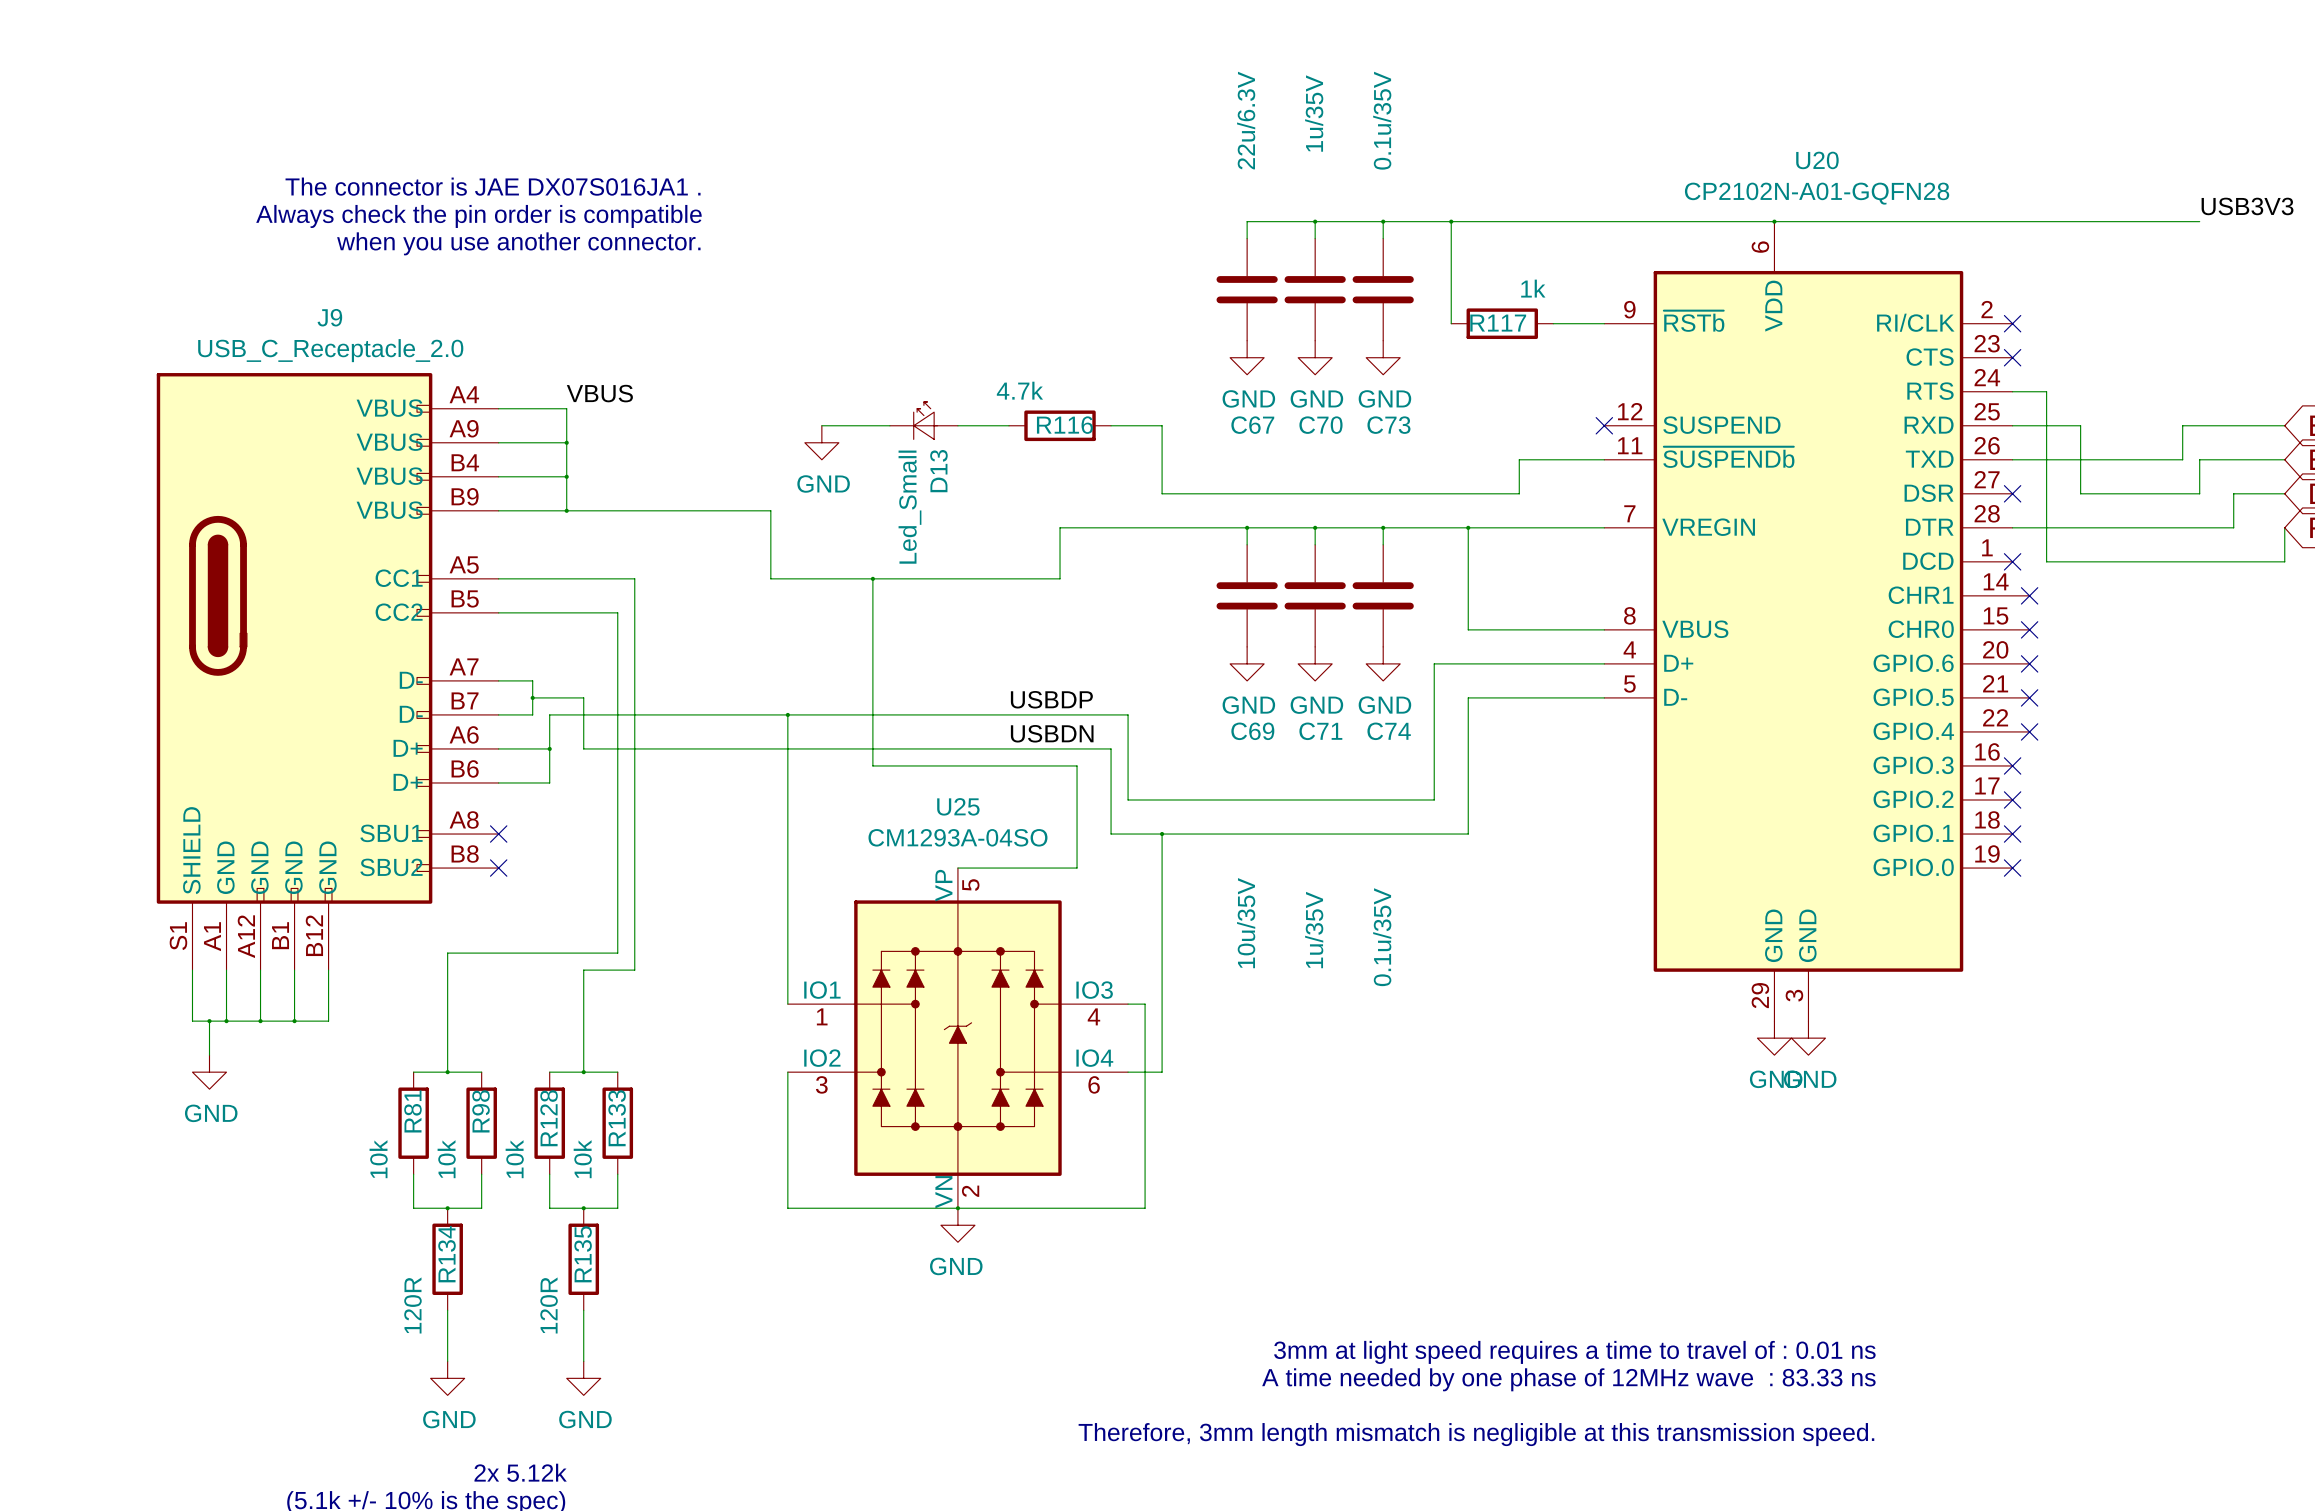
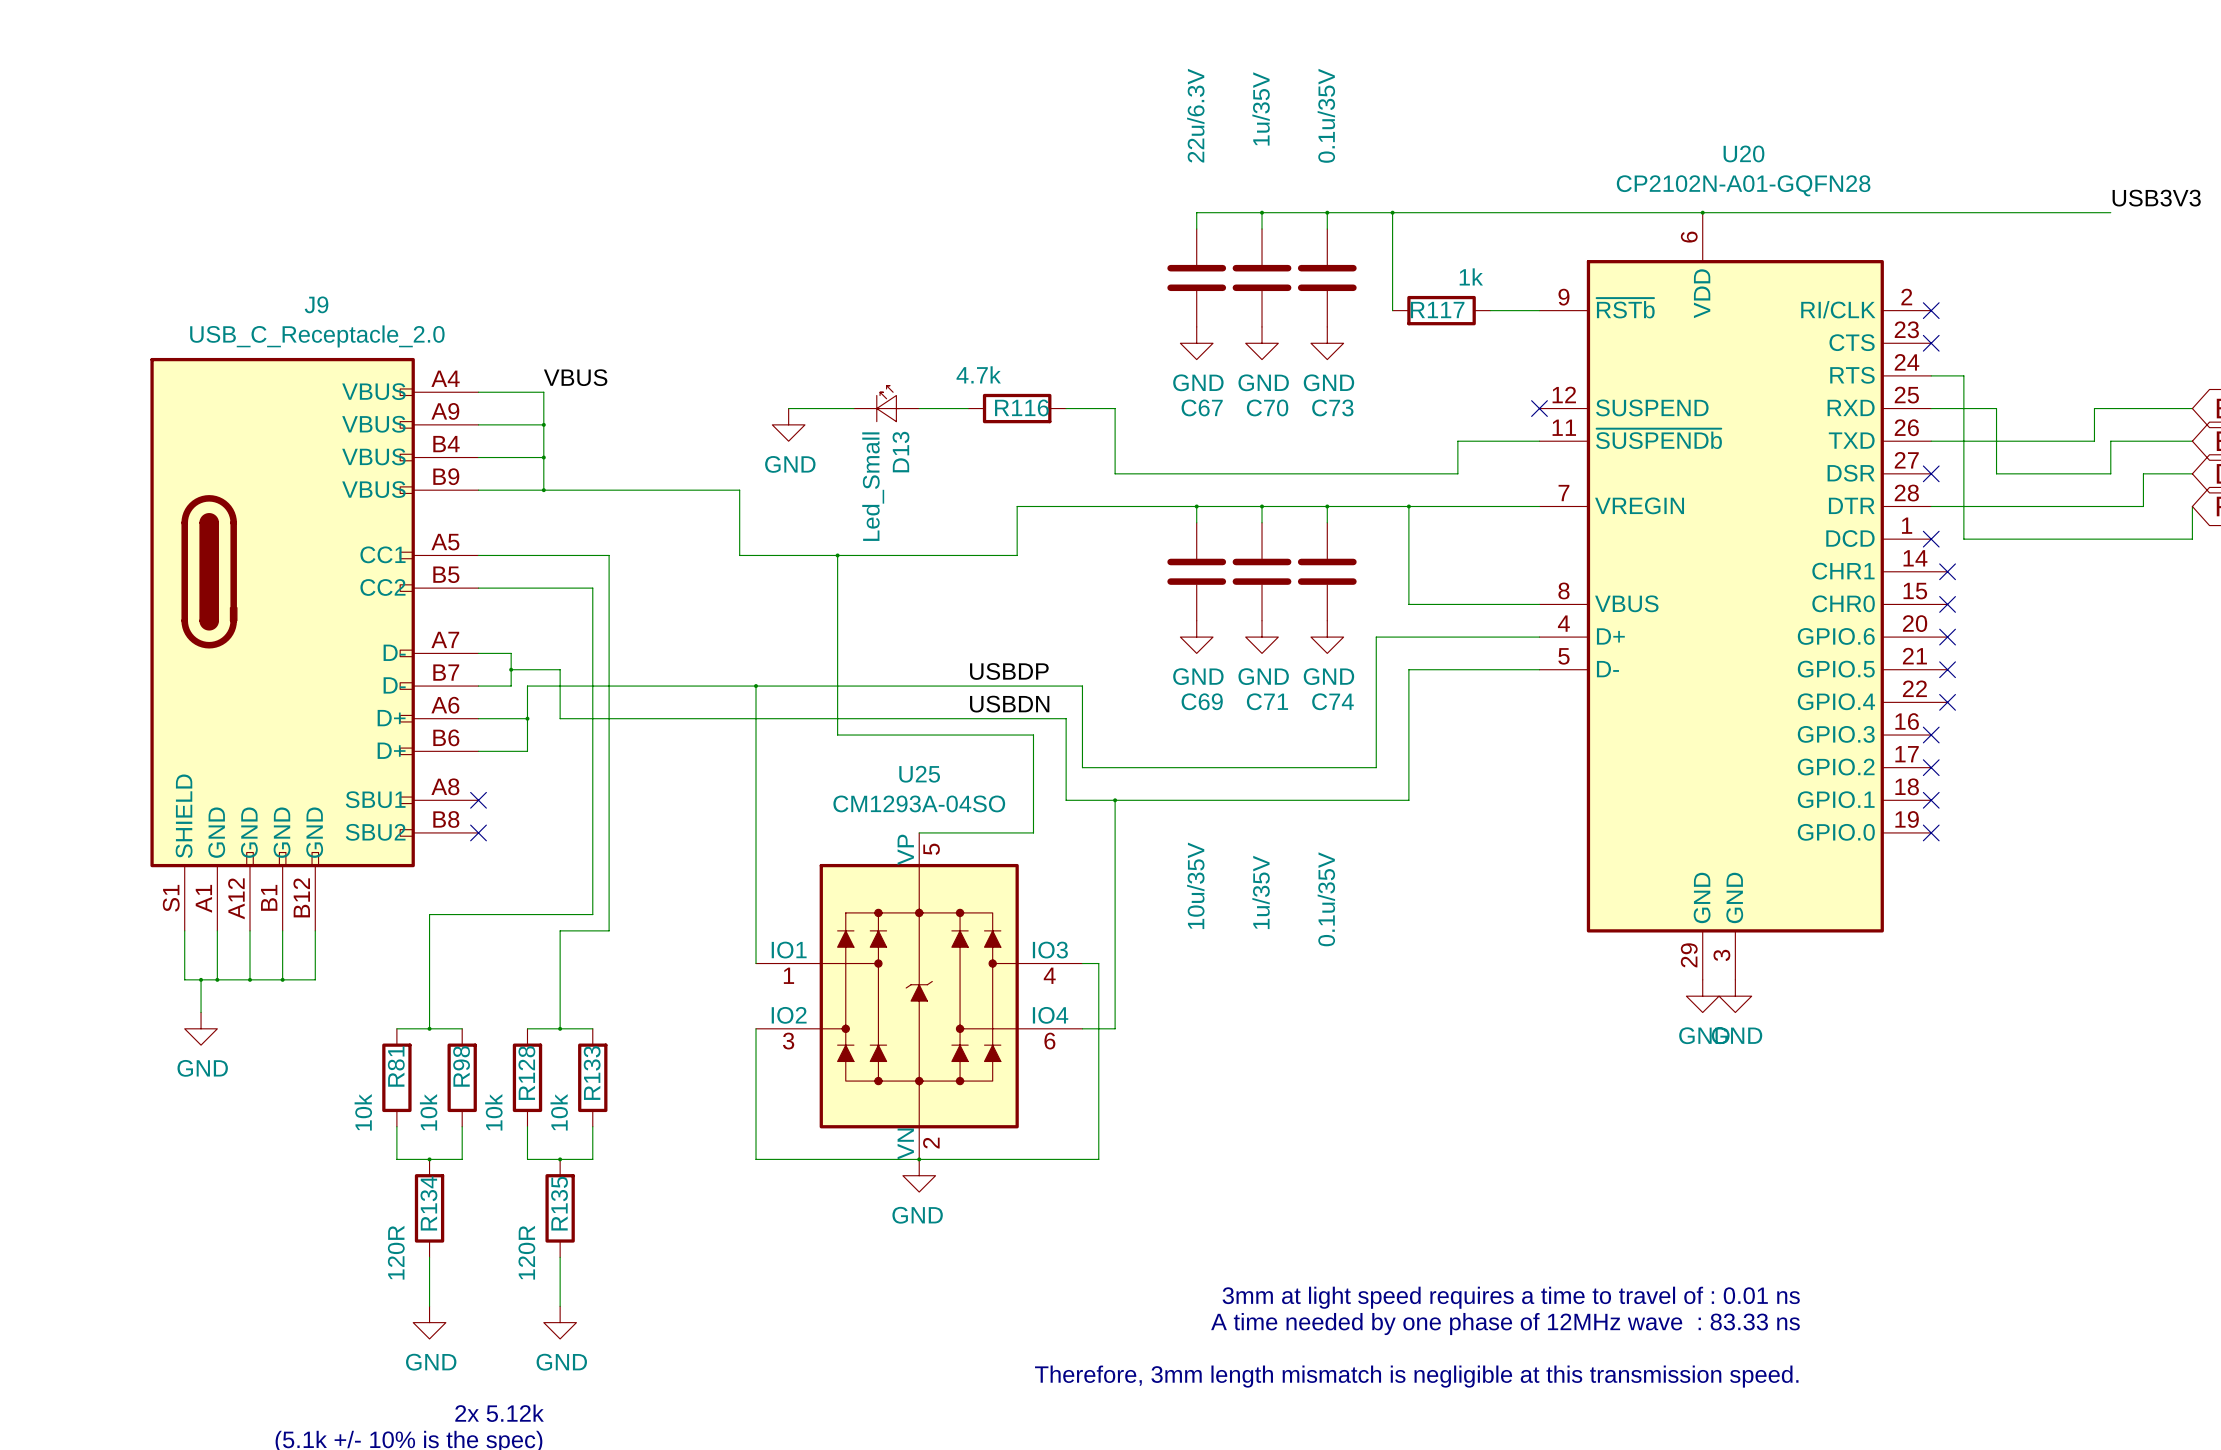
text: The connector is JAE DX07S016JA1 . (493, 186) -> none
text: Always check the pin order is compatible (478, 216) -> none
text: when you use another connector. (518, 243) -> none

